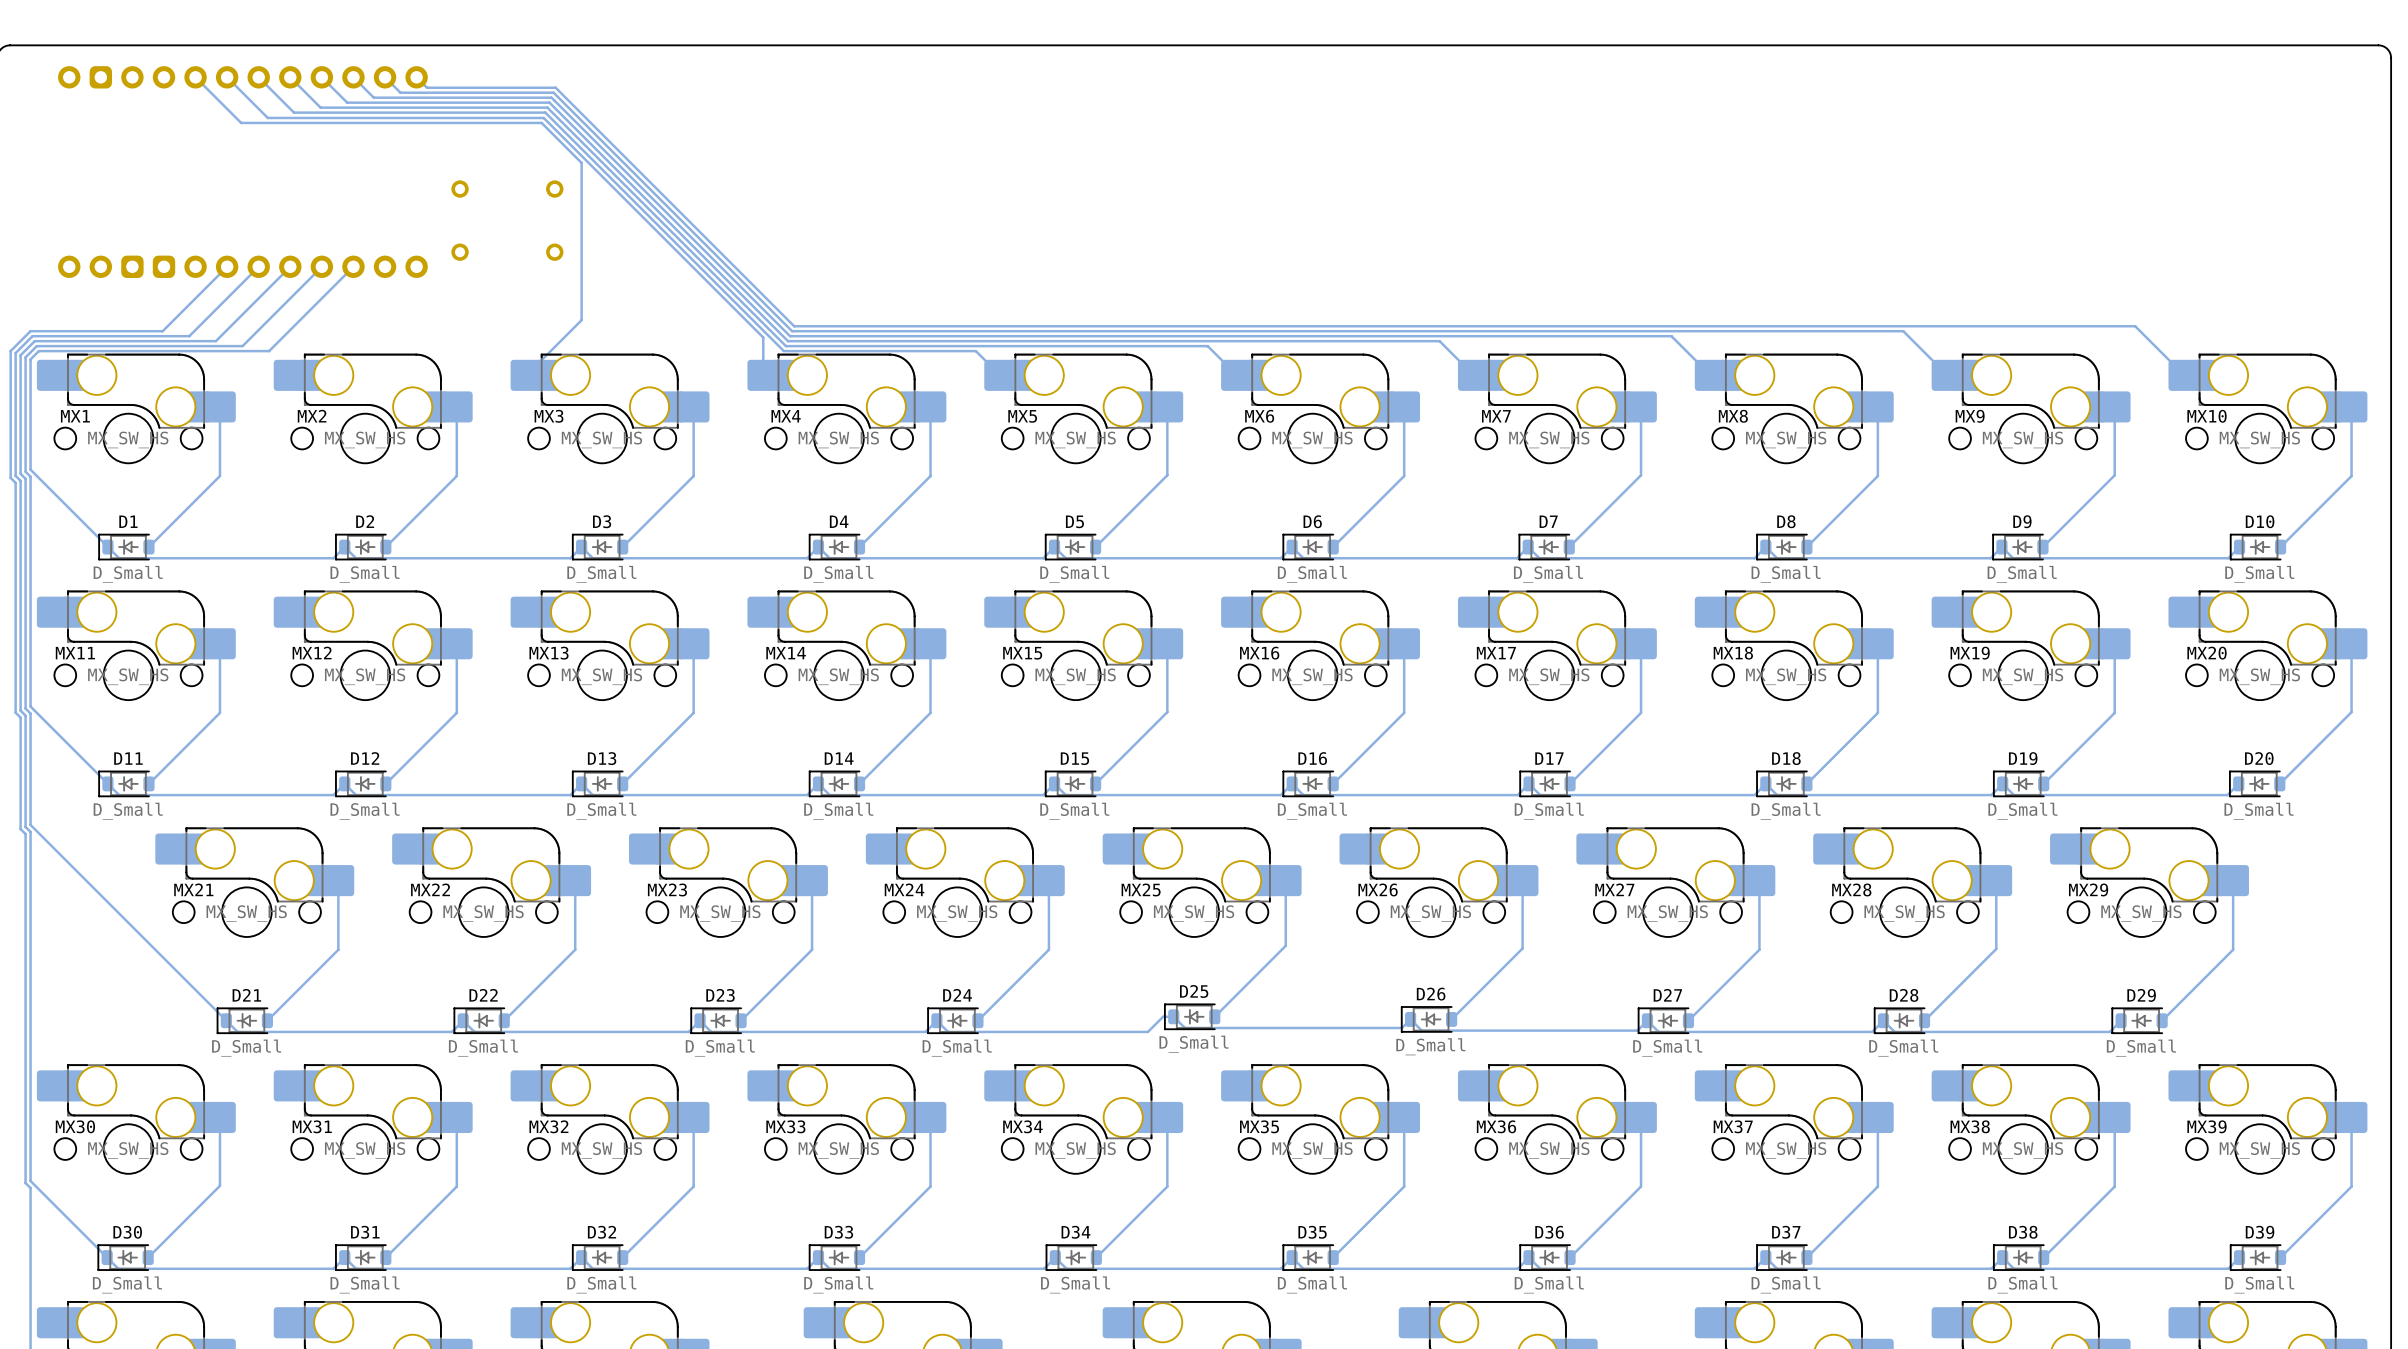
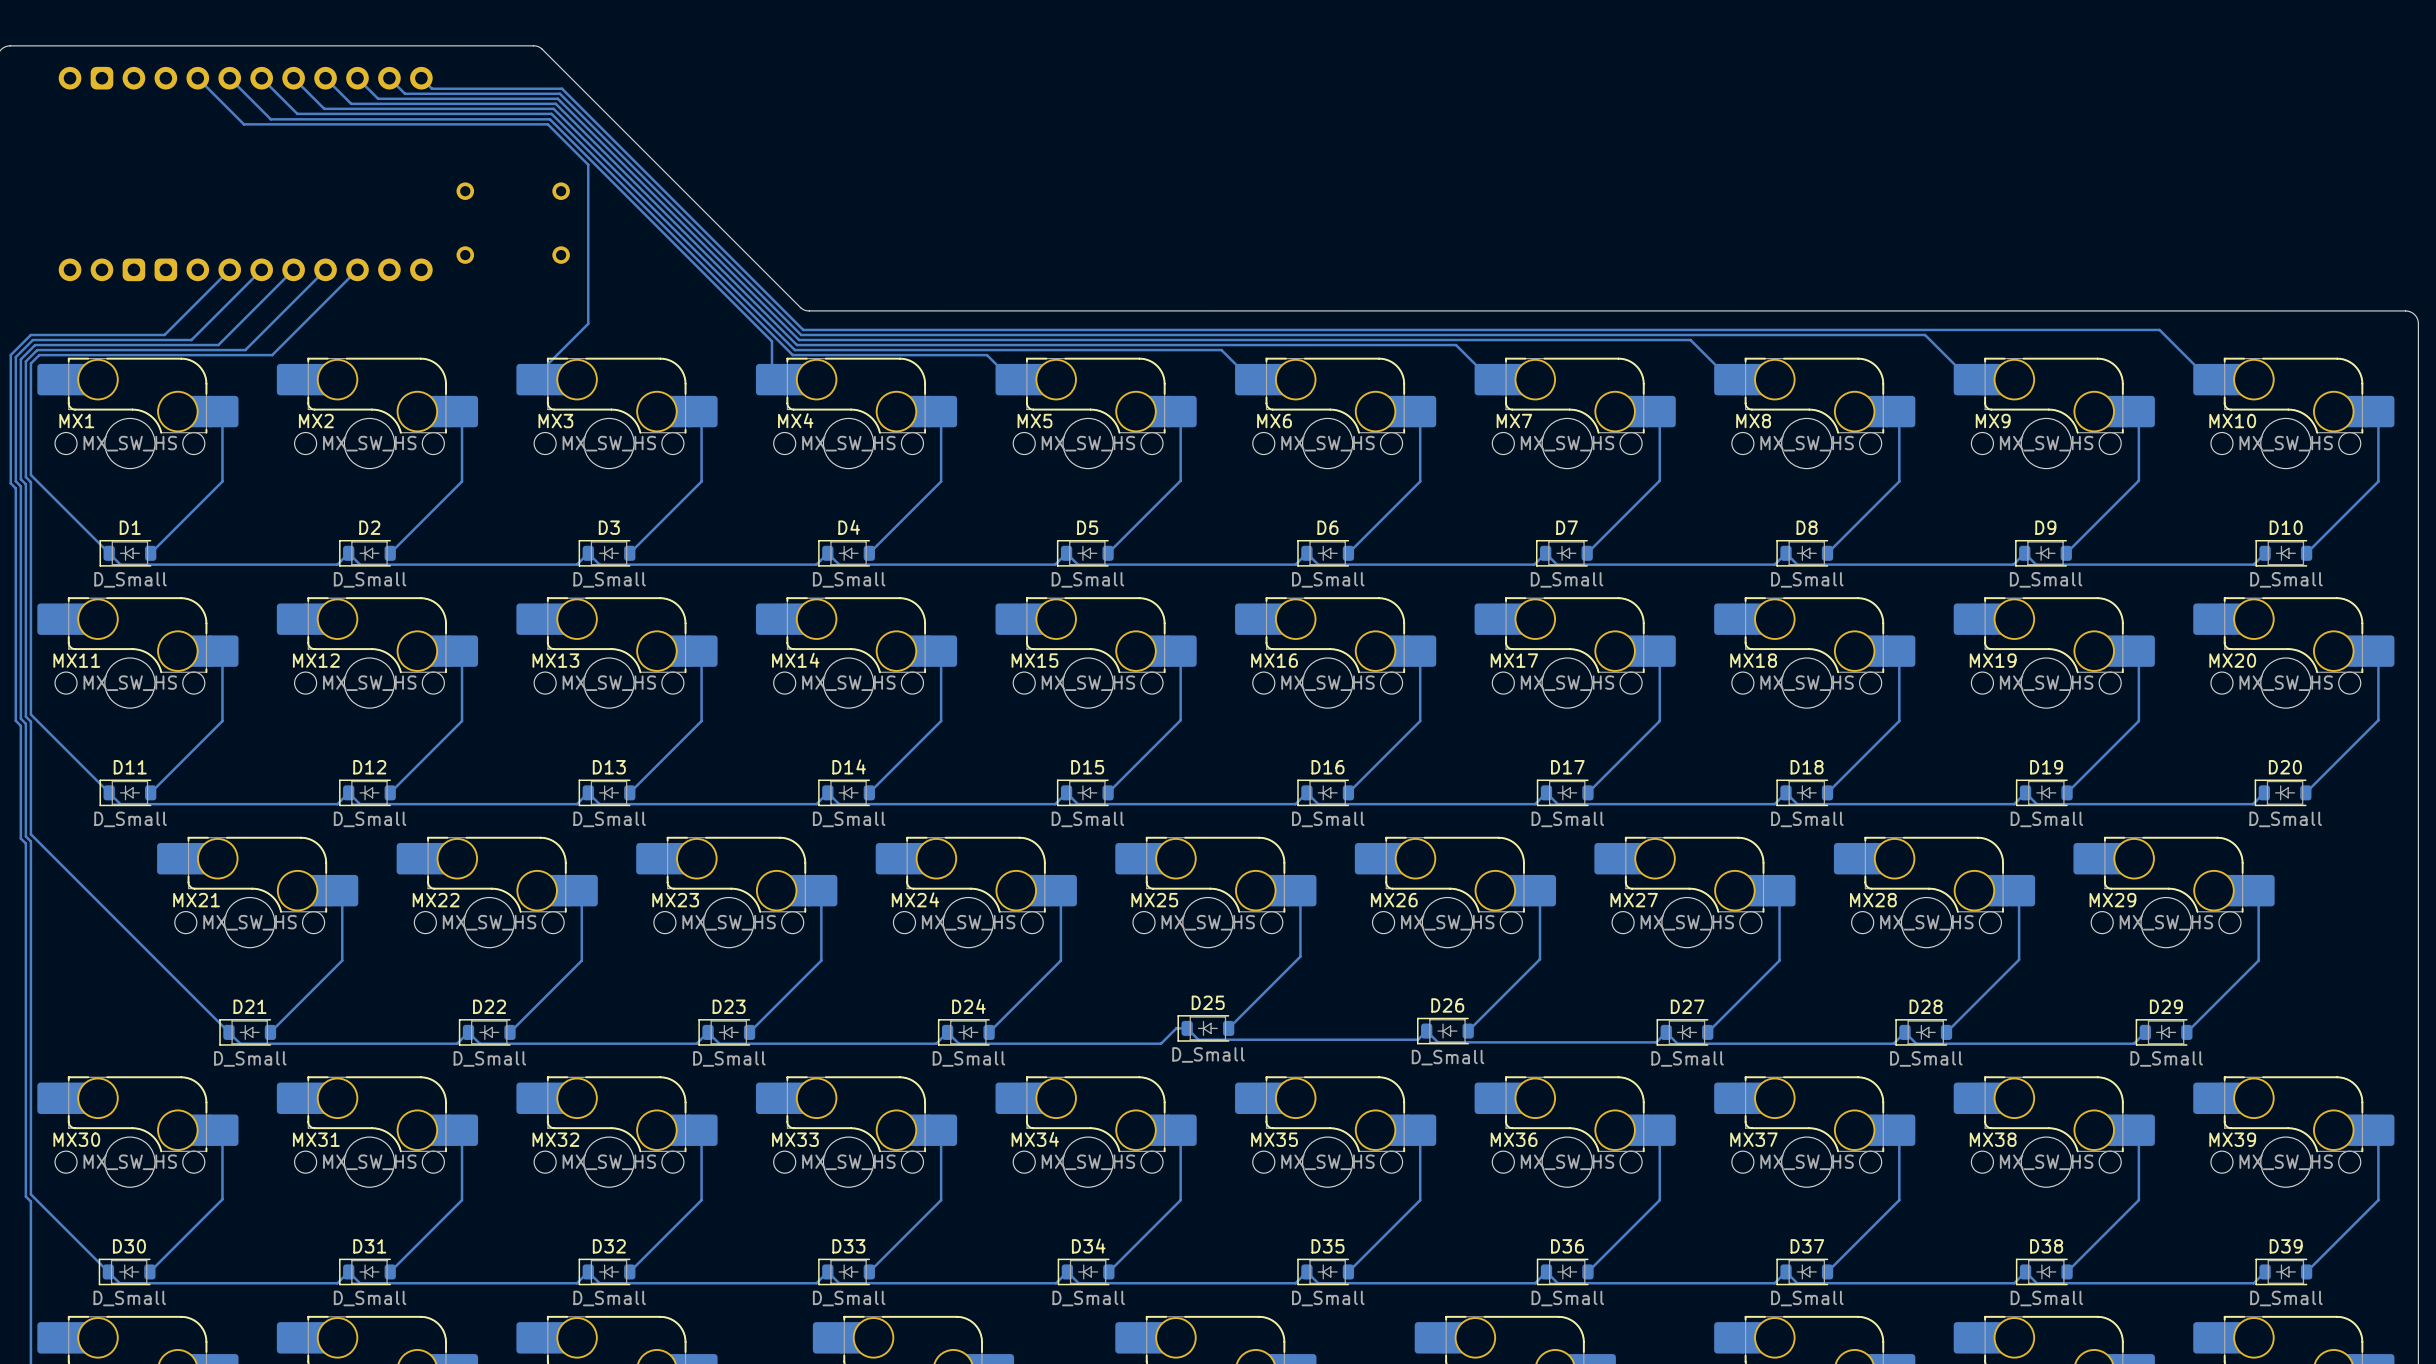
board edge: (10, 45) (2380, 45) (2387, 49) (2391, 57) (2391, 320) -> (10, 45) (537, 46) (800, 307) (806, 310) (2405, 310) (2414, 314) (2418, 323)

